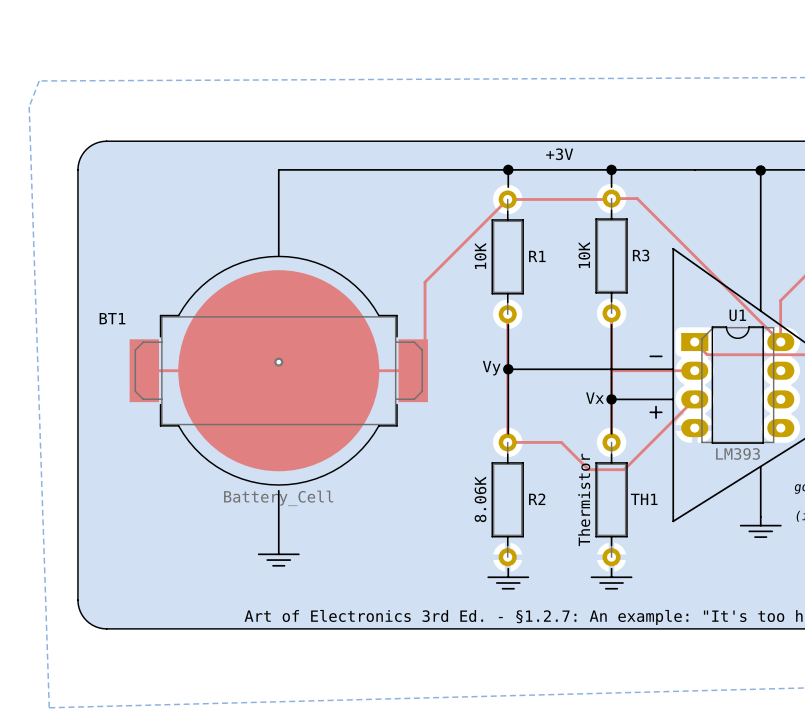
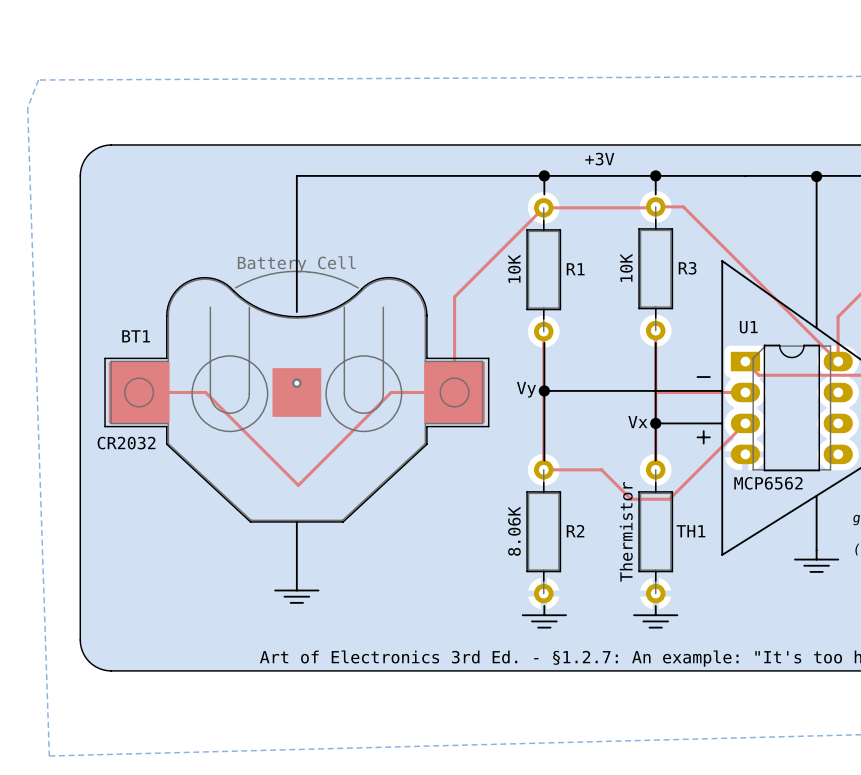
BT1 footprint: [129, 255, 428, 486] -> [104, 270, 490, 523]
line: none -> (296, 269) (296, 312)
U1 name position: U1 (737, 315) -> U1 (748, 327)
U1 value: LM393 (738, 453) -> MCP6562 (768, 483)
BT1 value position: Battery_Cell (278, 498) -> Battery_Cell (296, 264)

